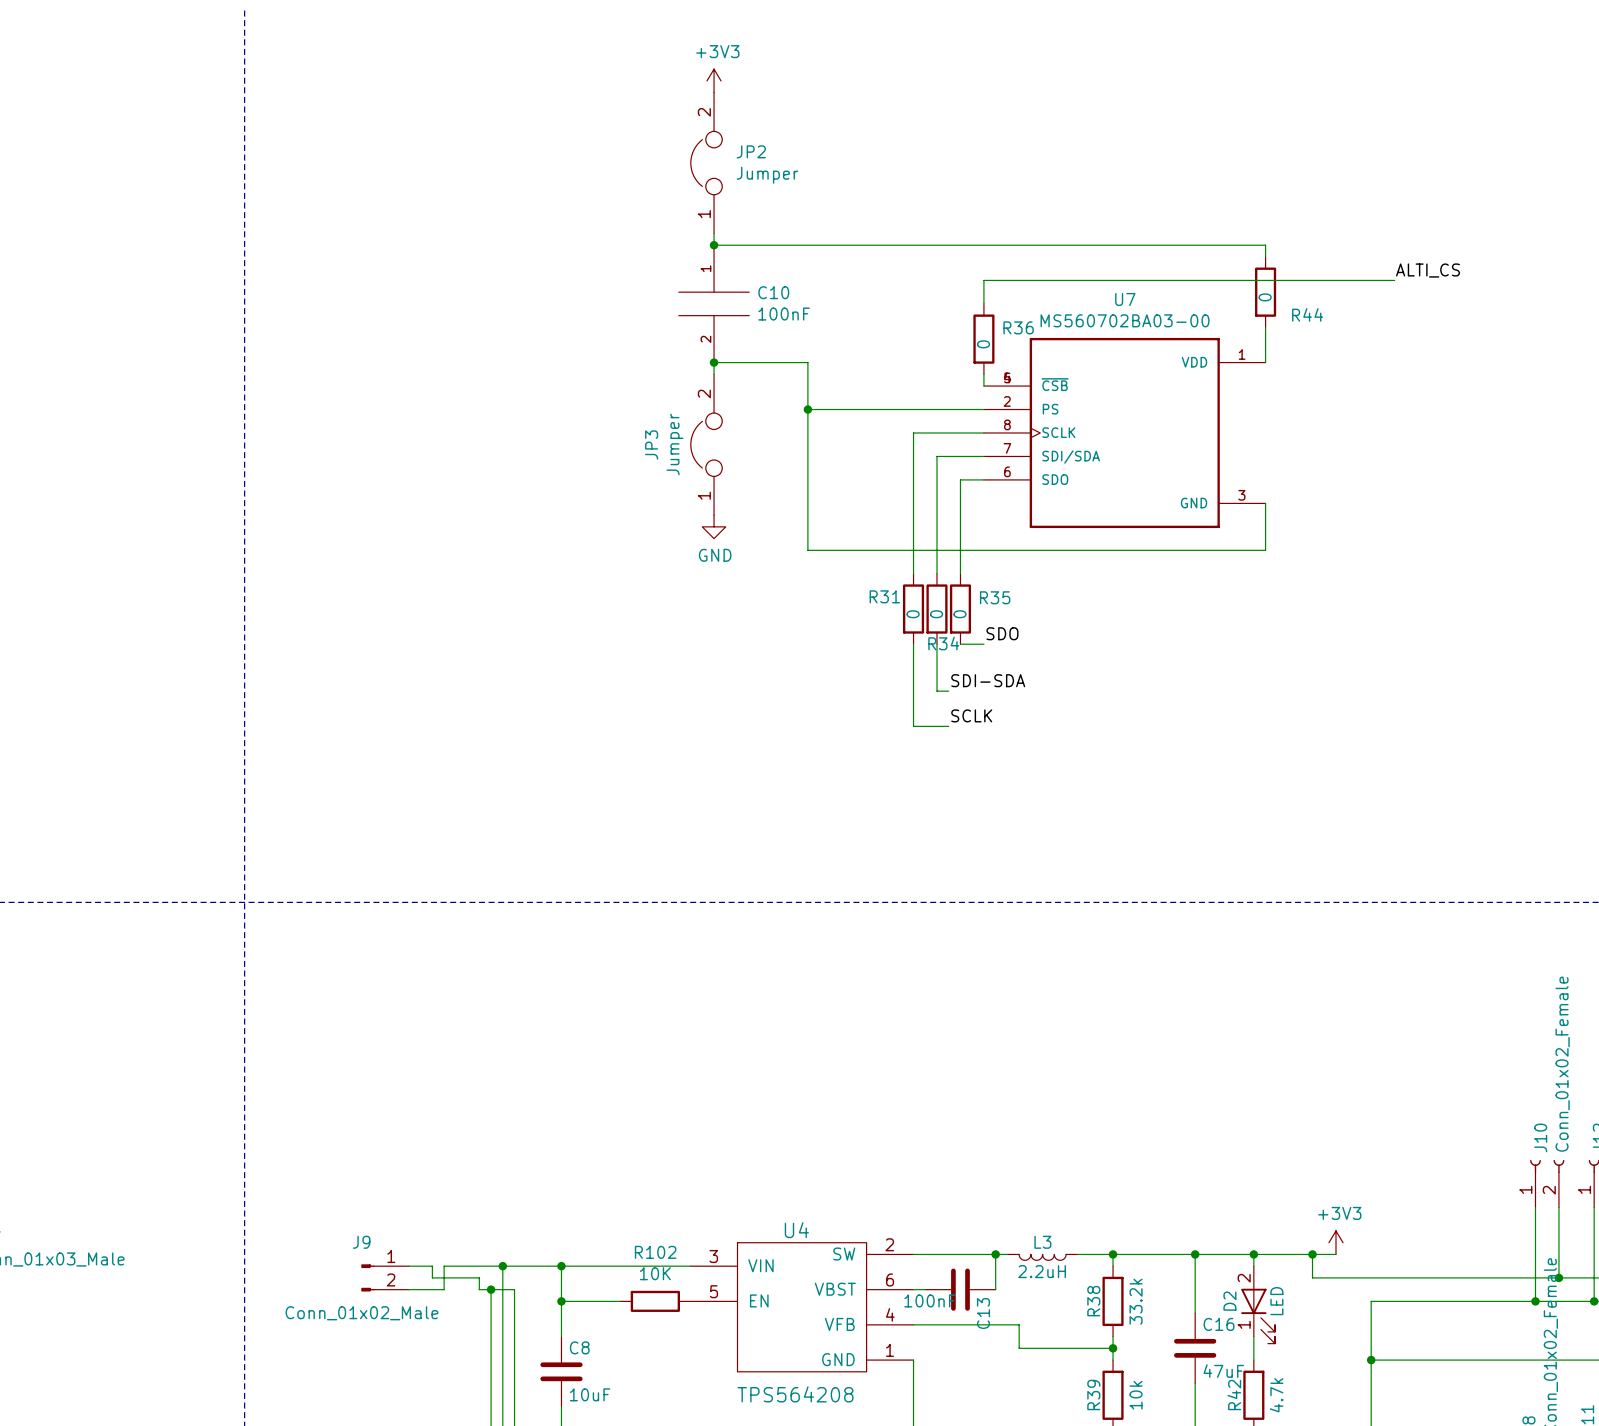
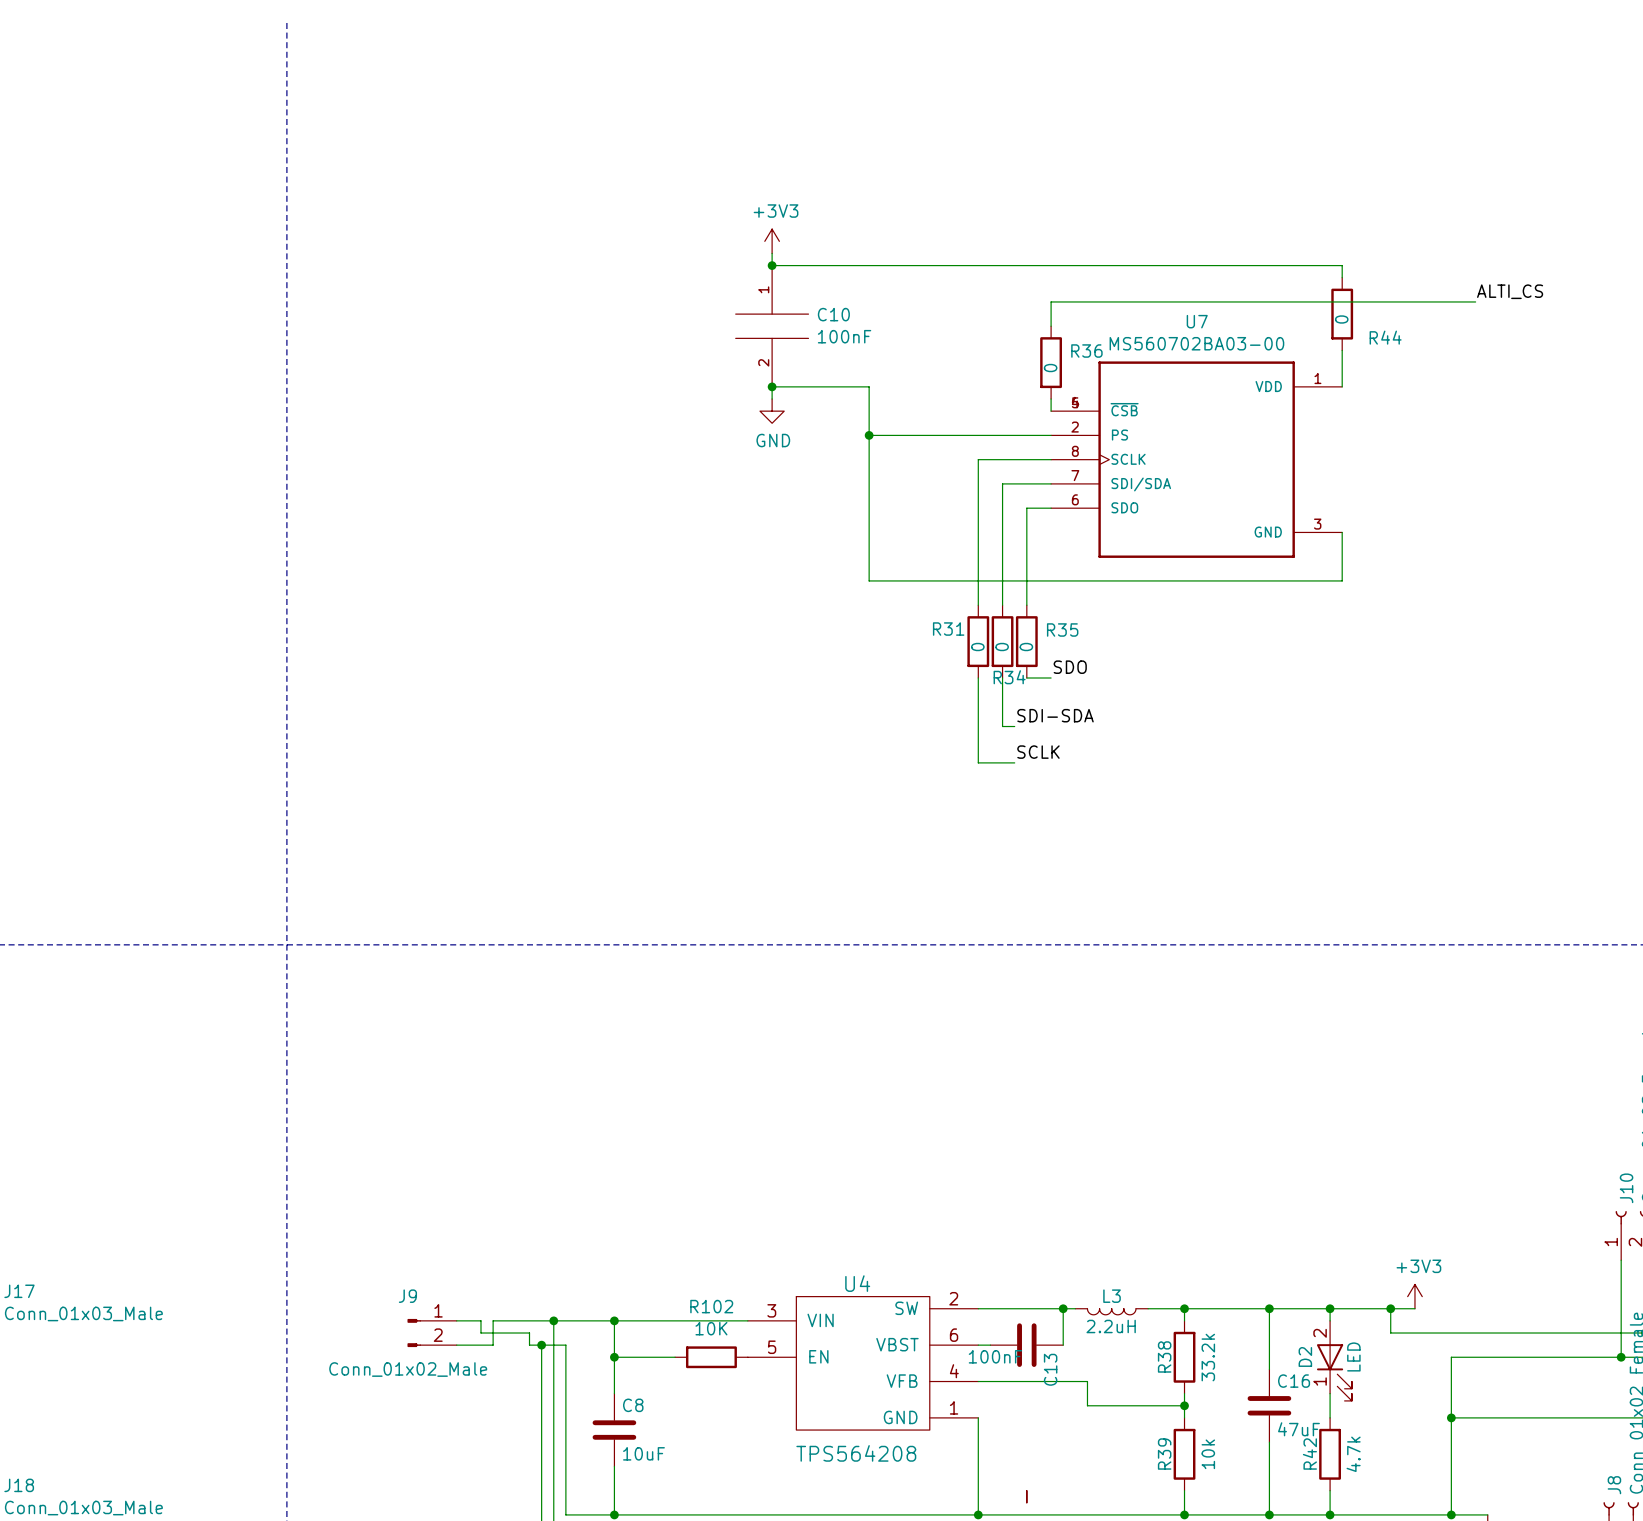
power symbol position: +3V3 (714, 80) -> +3V3 (772, 241)
JP2: Jumper (706, 163) -> none
JP3: Jumper (706, 444) -> none
power symbol position: GND (714, 526) -> GND (772, 411)

